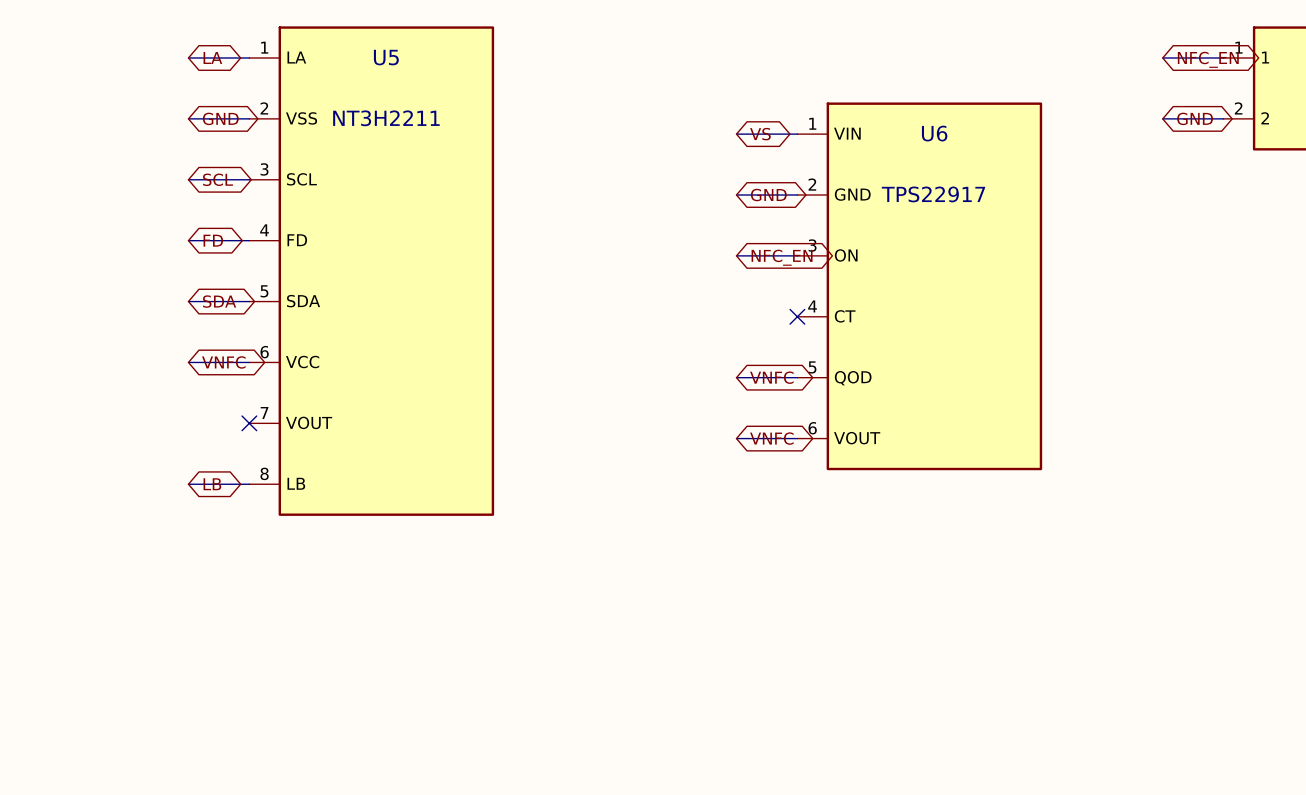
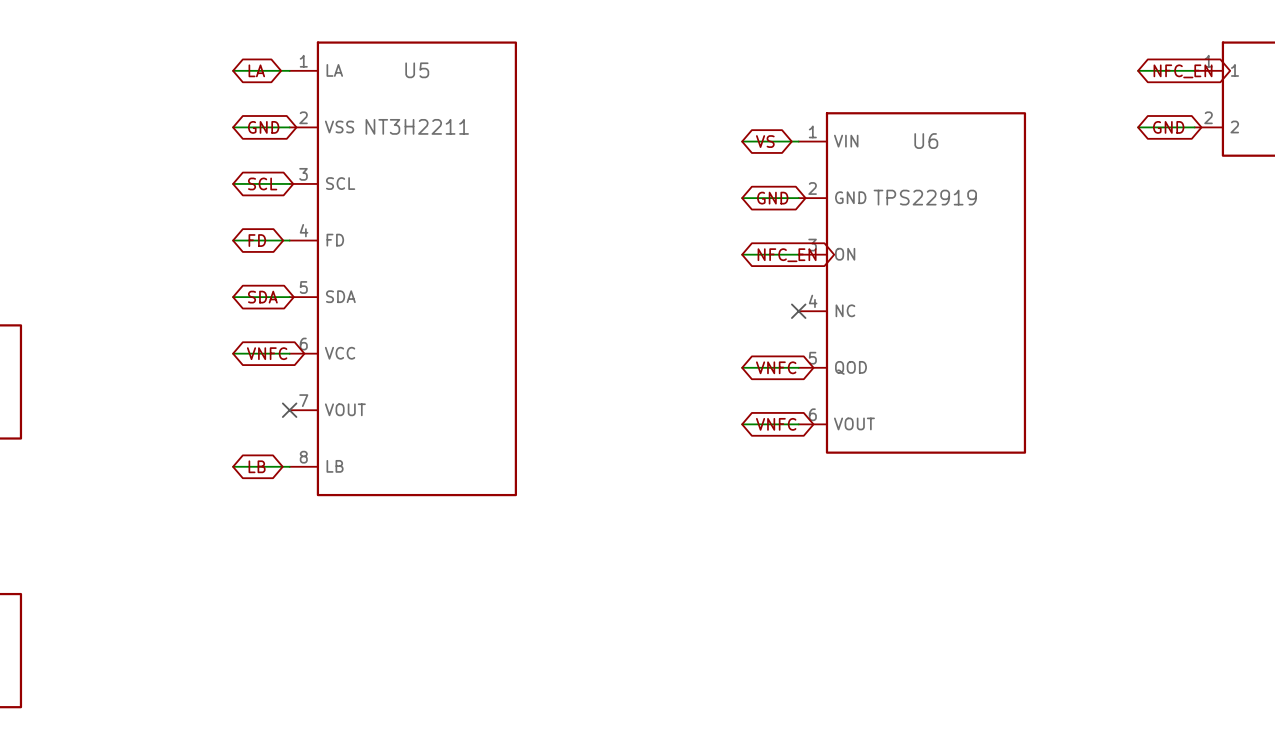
U6 value: TPS22917 (933, 194) -> TPS22919 (925, 197)
U6 pin name: CT (845, 316) -> NC (845, 310)

